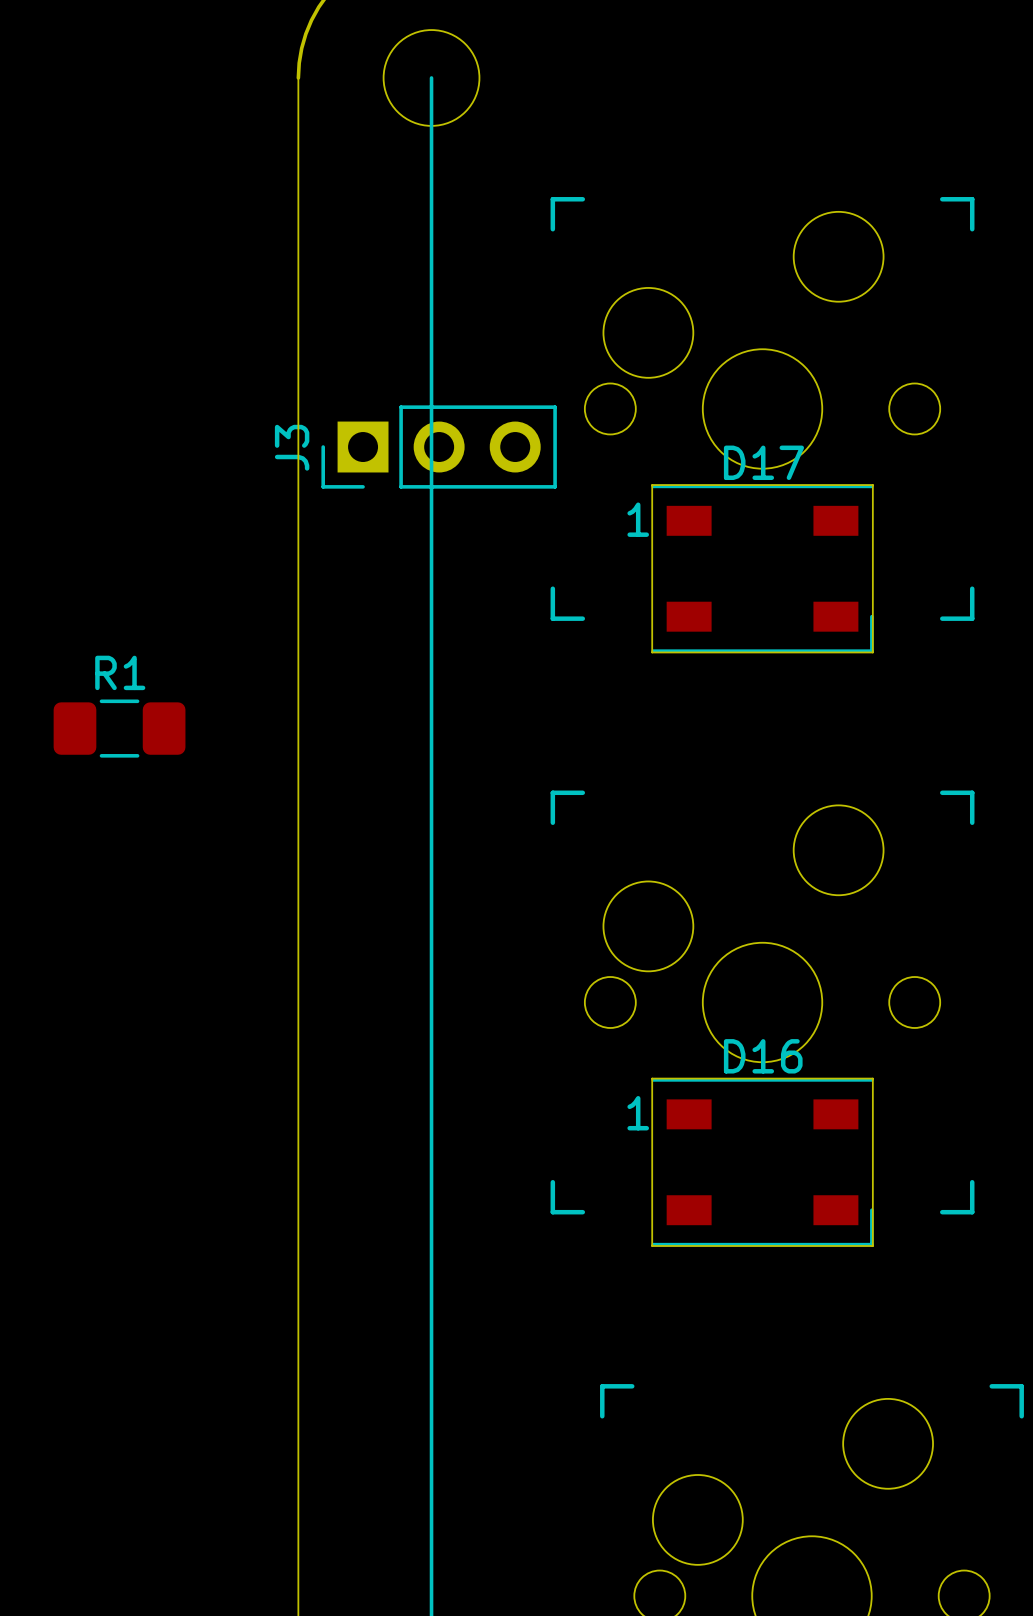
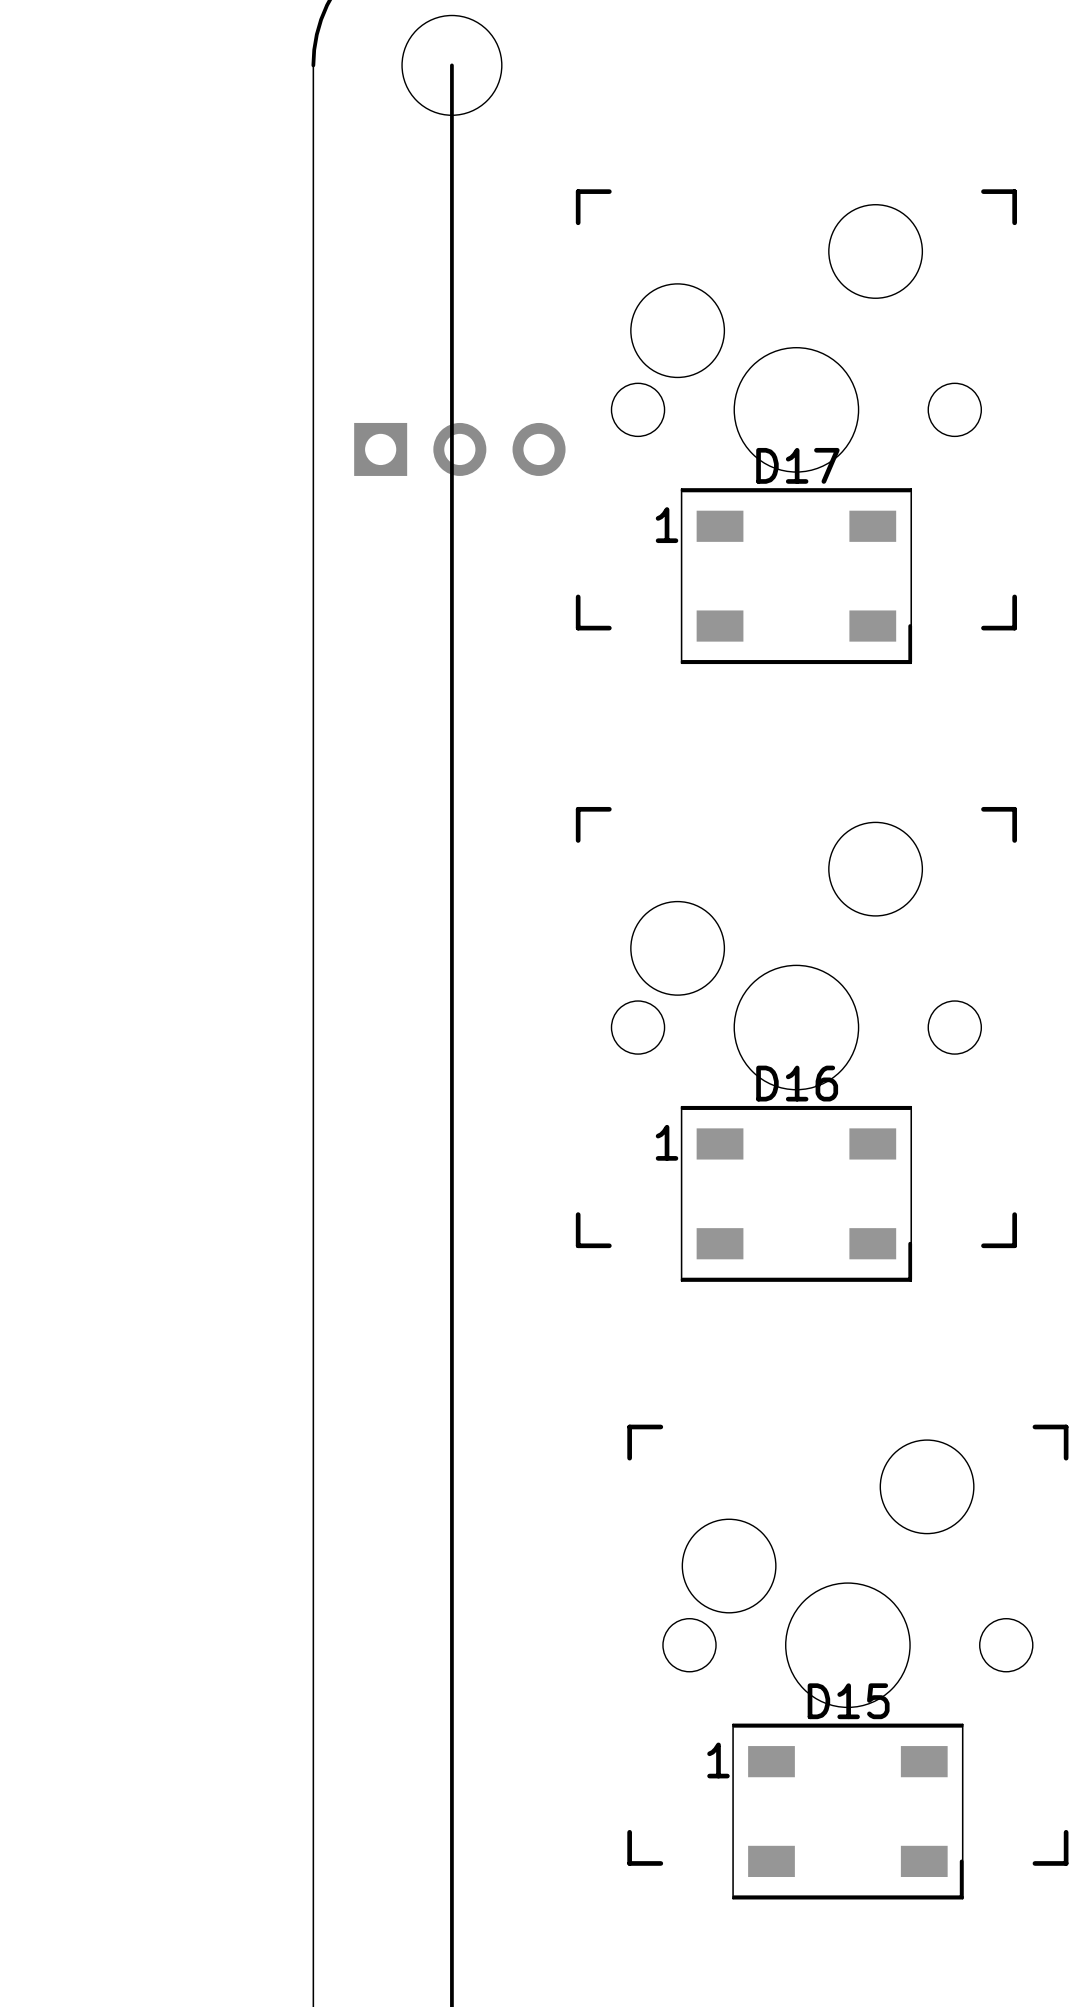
J3 side: top (439, 447) -> bottom (459, 449)
R1: (119, 728) -> none

